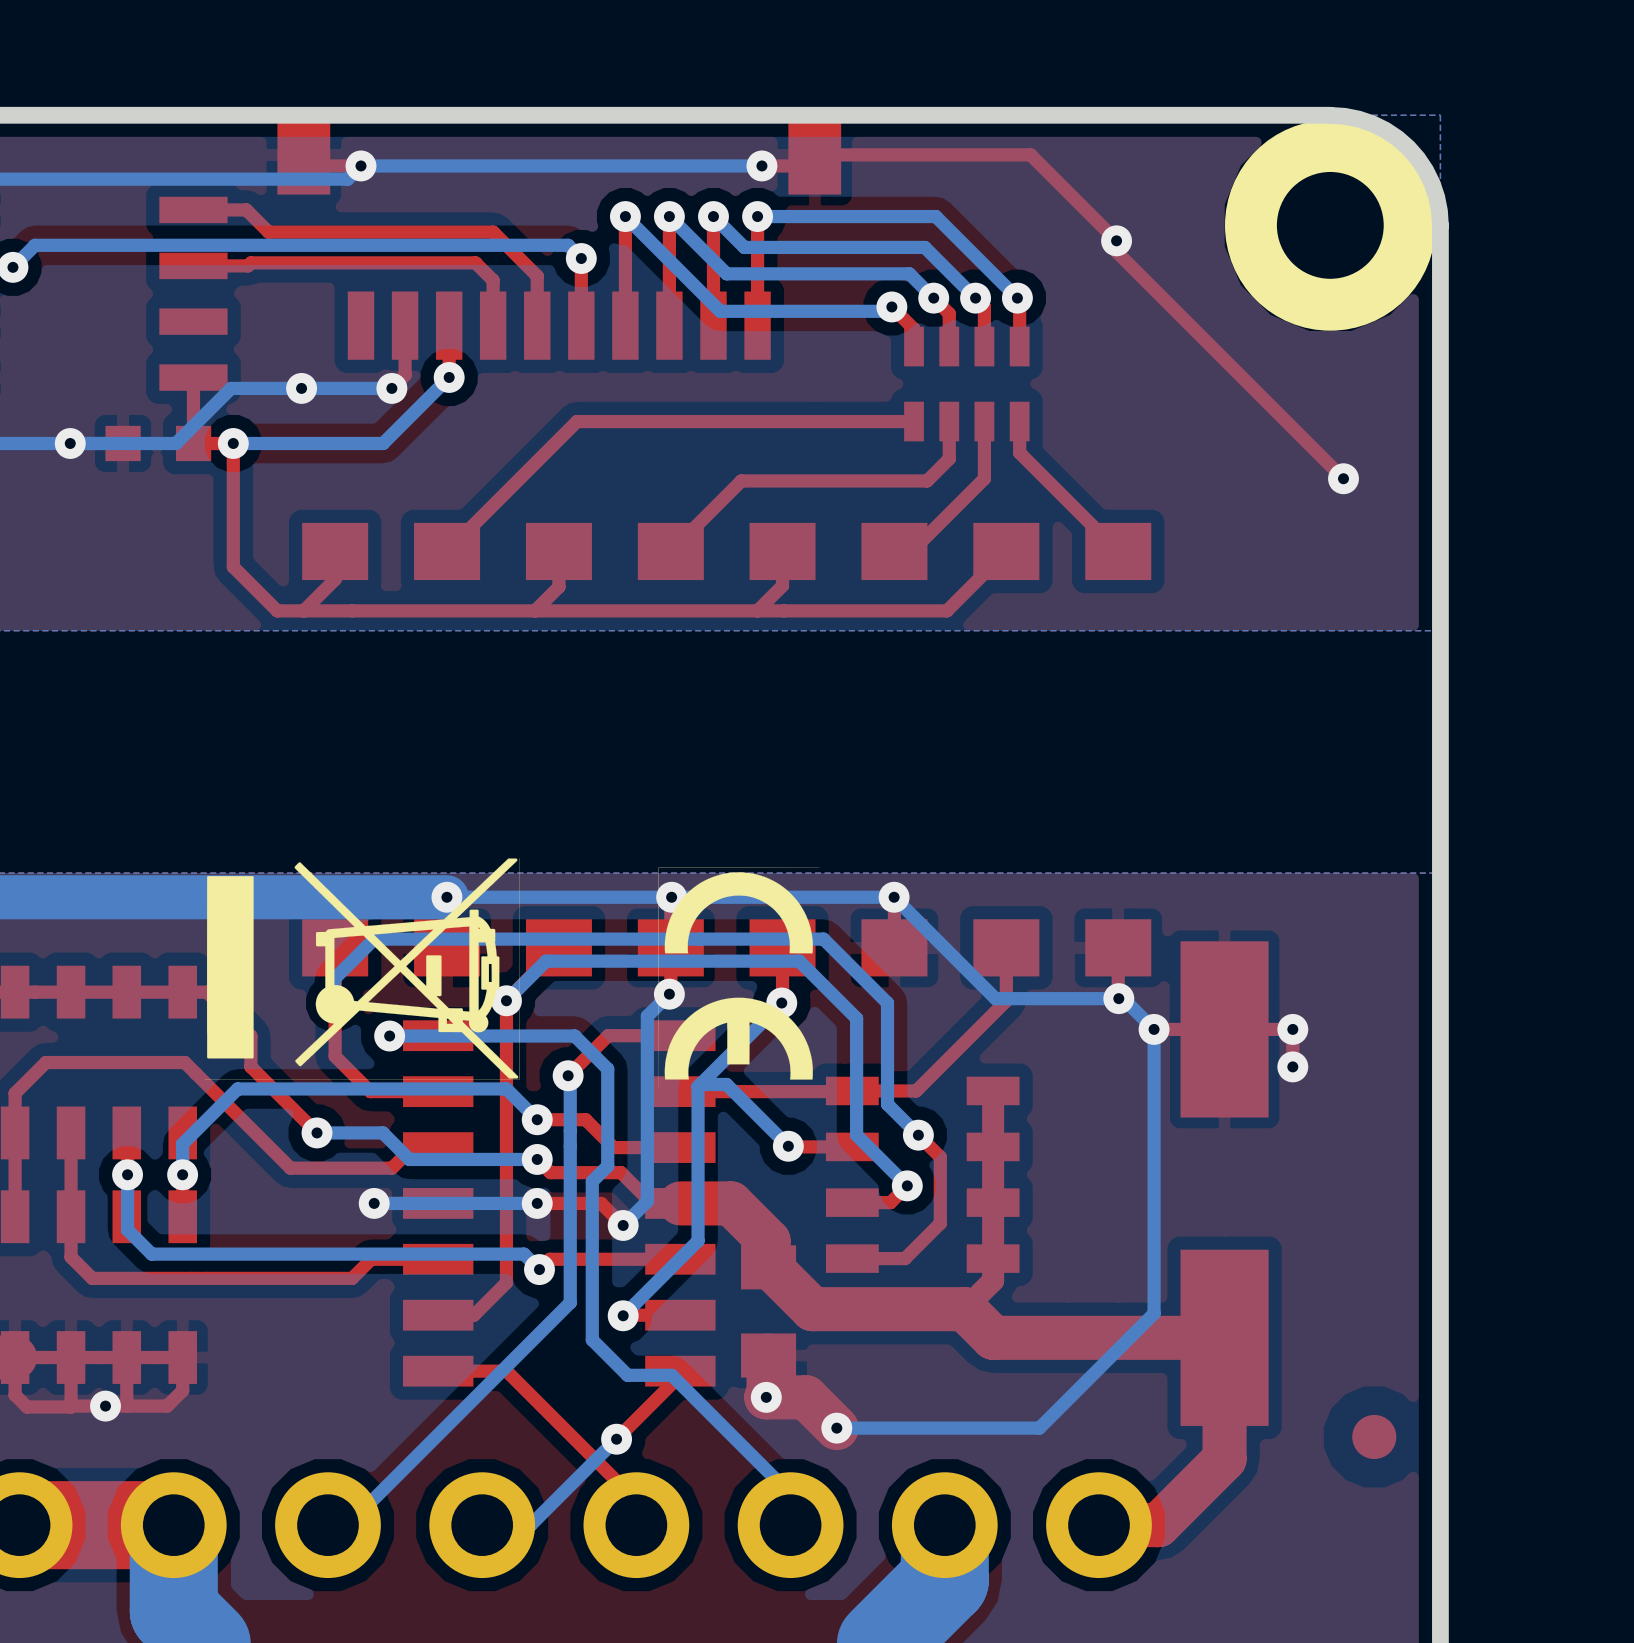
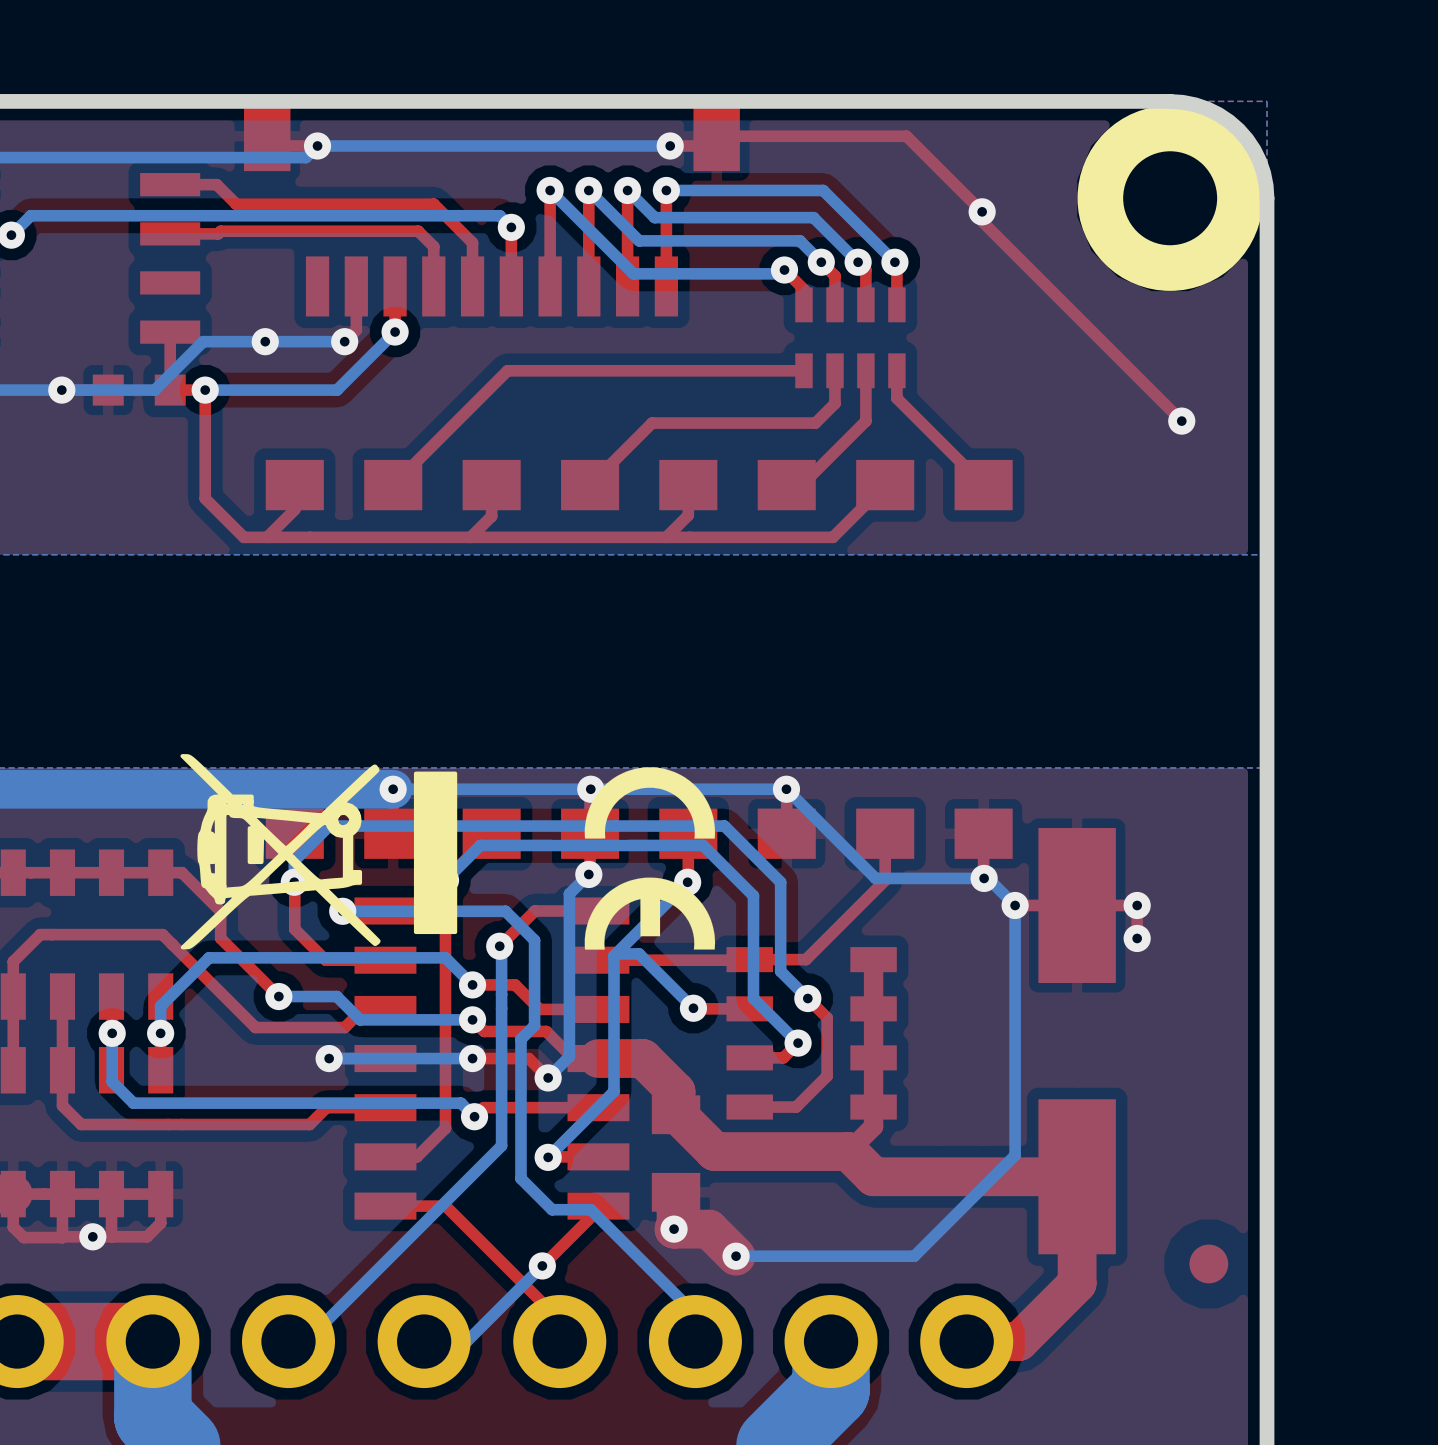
drawing shape: [204, 858, 520, 1080] -> [180, 754, 458, 950]
drawing shape: [658, 867, 820, 1088] -> [584, 767, 716, 950]

